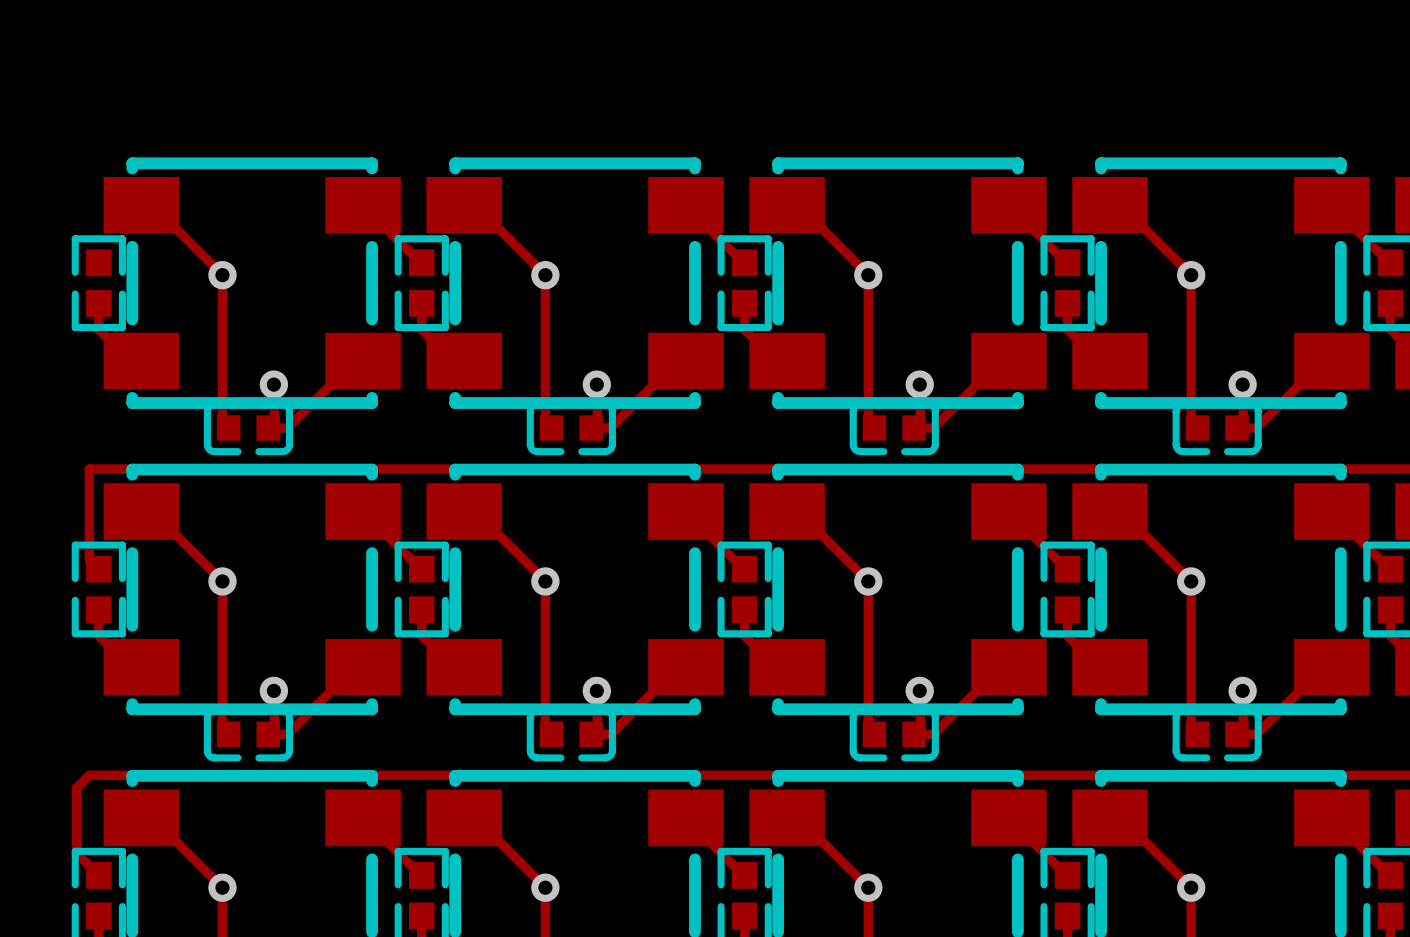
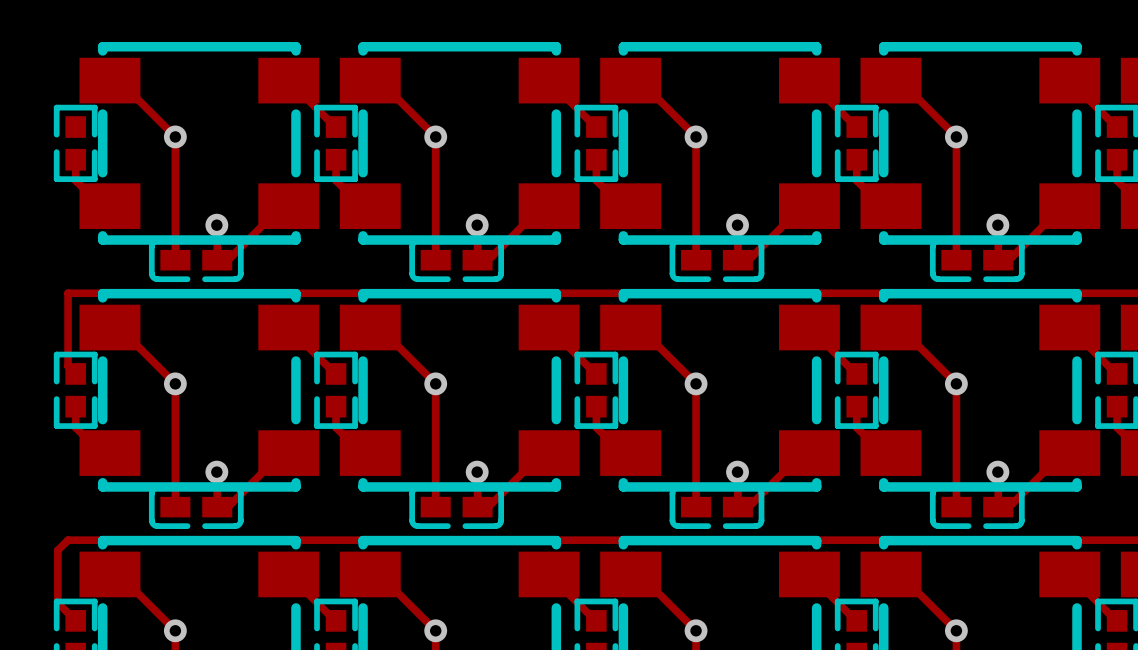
part footprint: [203, 400, 294, 456] -> [148, 238, 244, 283]
part footprint: [526, 400, 616, 456] -> [409, 238, 505, 283]
part footprint: [849, 400, 939, 456] -> [669, 238, 765, 283]
part footprint: [1172, 400, 1262, 456] -> [929, 238, 1025, 283]
part footprint: [203, 707, 294, 762] -> [148, 485, 244, 529]
part footprint: [526, 707, 616, 762] -> [409, 485, 505, 529]
part footprint: [849, 707, 939, 762] -> [669, 485, 765, 529]
part footprint: [1172, 707, 1262, 762] -> [929, 485, 1025, 529]

